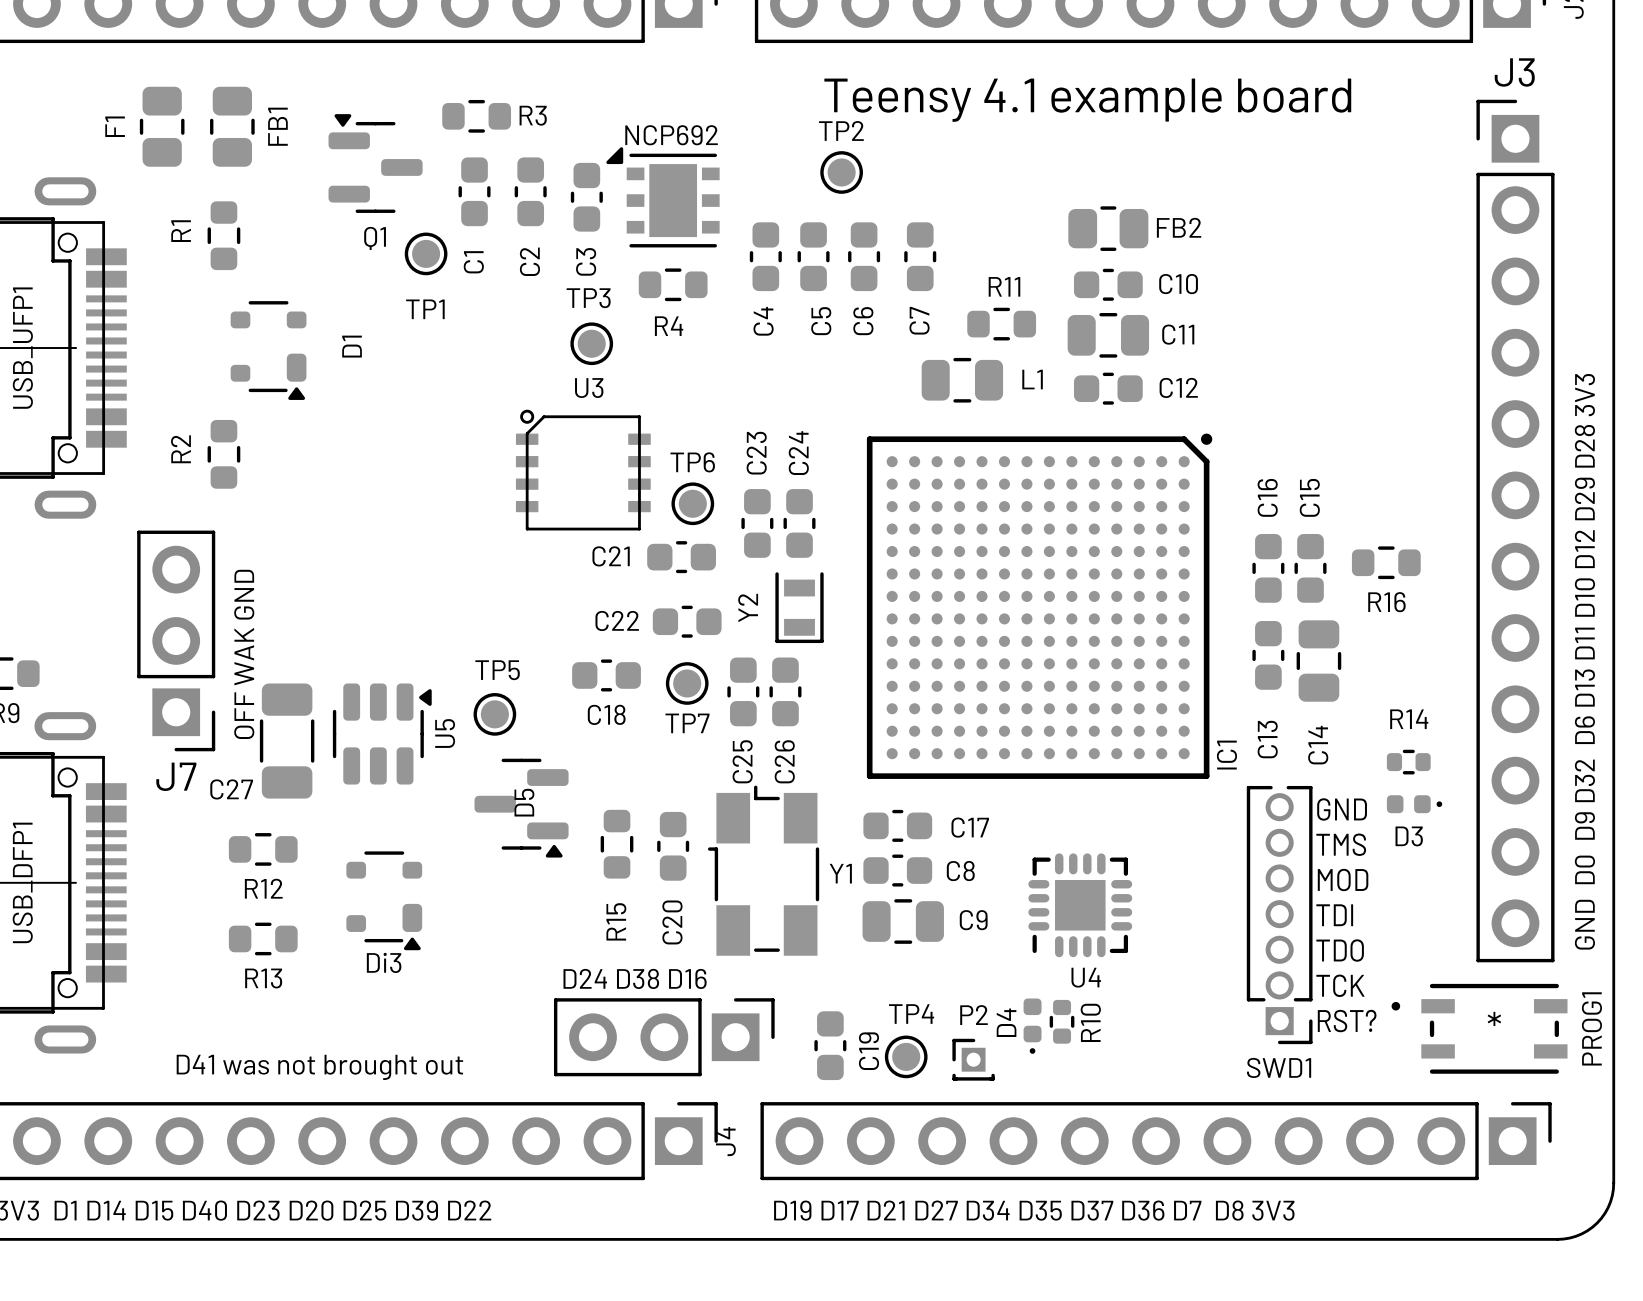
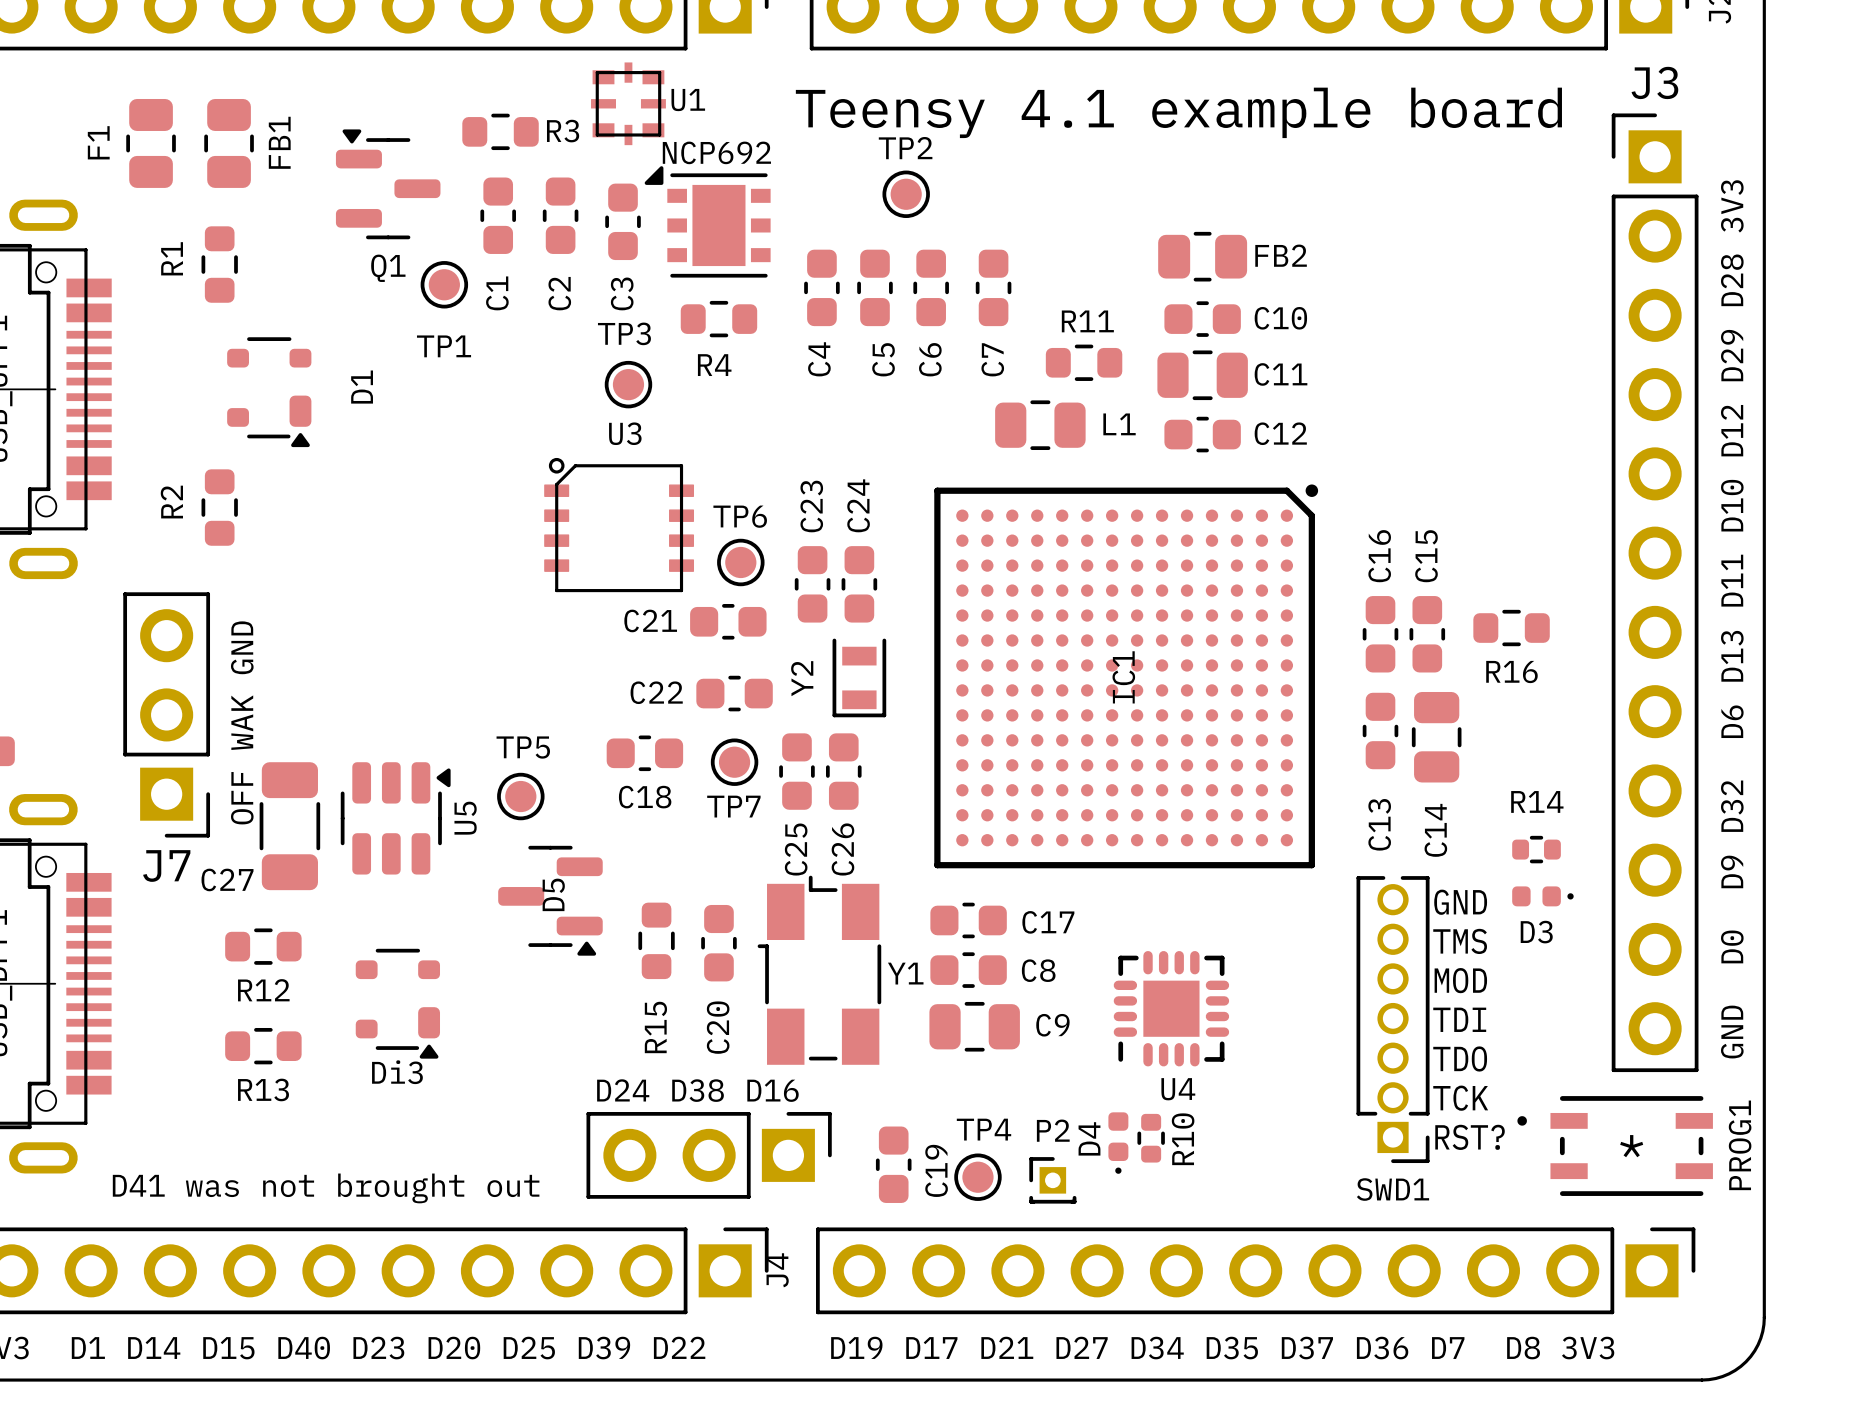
U1: none -> (628, 103)
IC1 name position: IC1 (1226, 755) -> IC1 (1123, 677)

